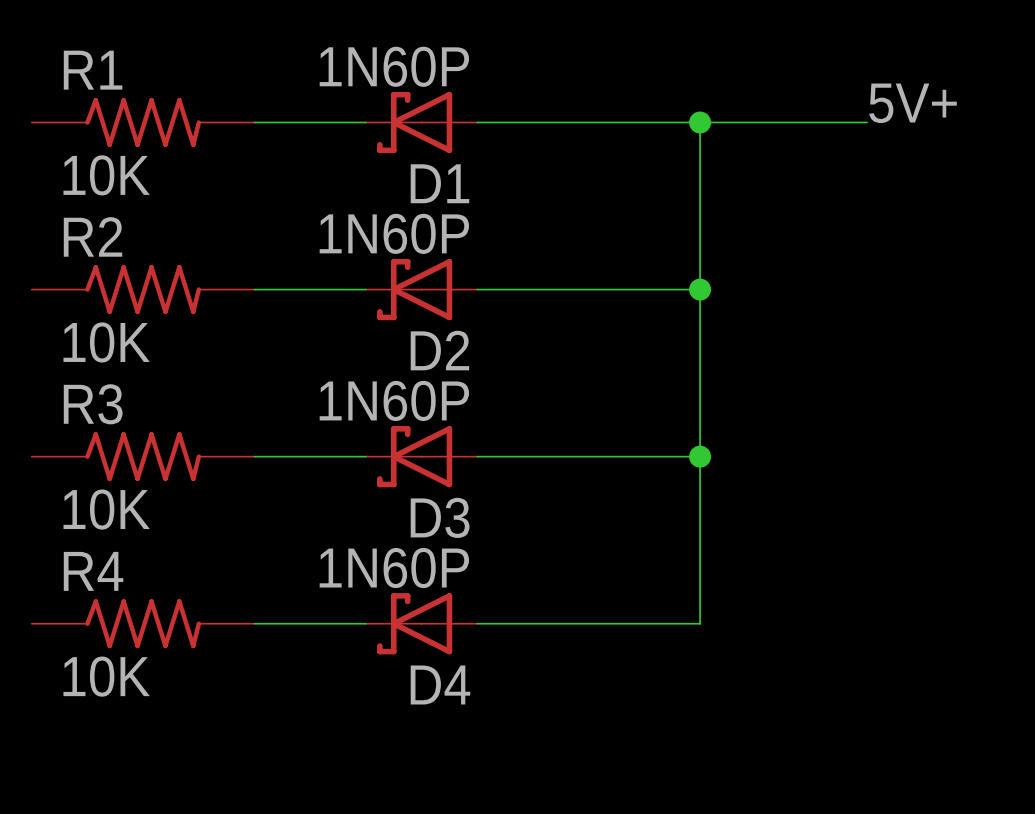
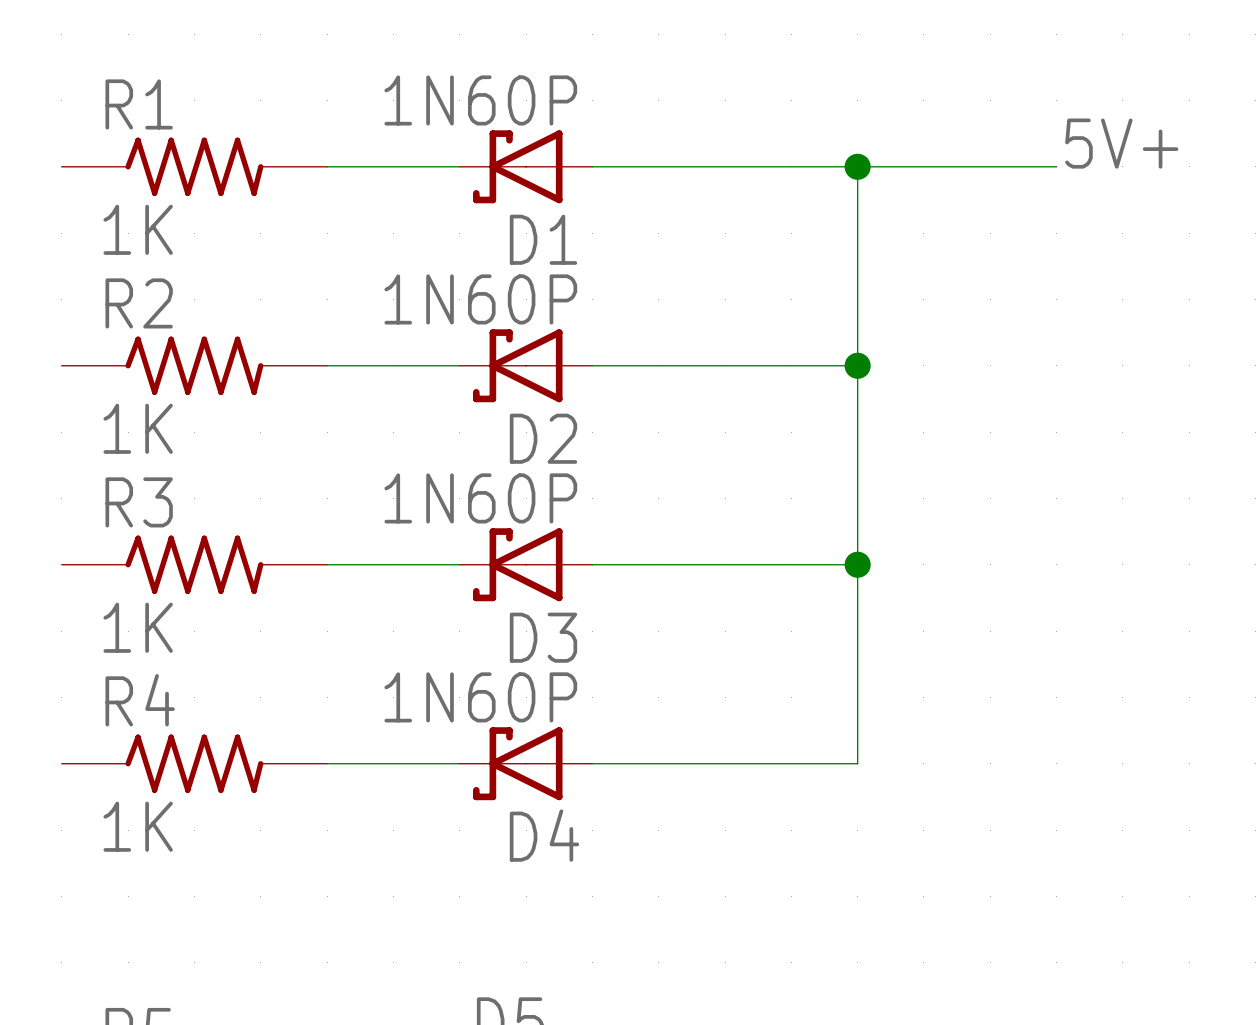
R1 value: 10K (106, 175) -> 1K (138, 229)
R2 value: 10K (106, 342) -> 1K (138, 428)
R3 value: 10K (106, 509) -> 1K (138, 627)
R4 value: 10K (106, 676) -> 1K (138, 826)

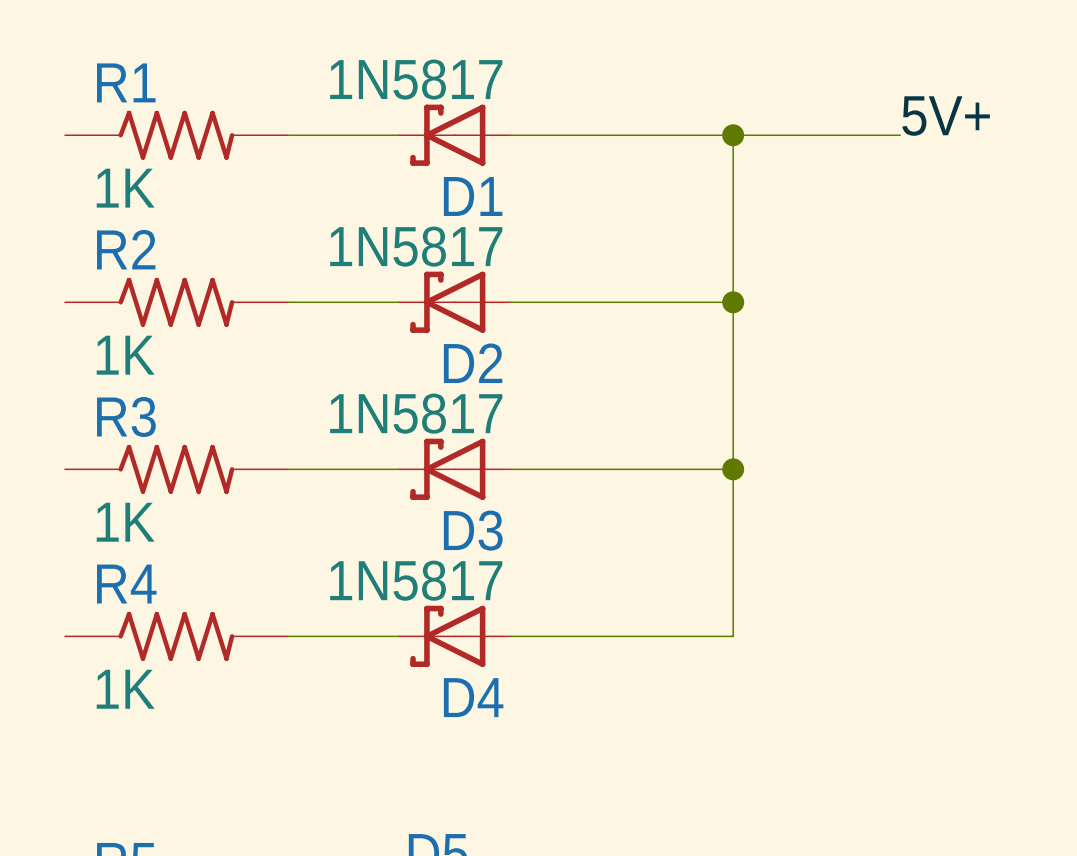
D1 value: 1N60P (480, 100) -> 1N5817 (416, 79)
D2 value: 1N60P (480, 299) -> 1N5817 (416, 246)
D3 value: 1N60P (480, 498) -> 1N5817 (416, 413)
D4 value: 1N60P (480, 697) -> 1N5817 (416, 580)

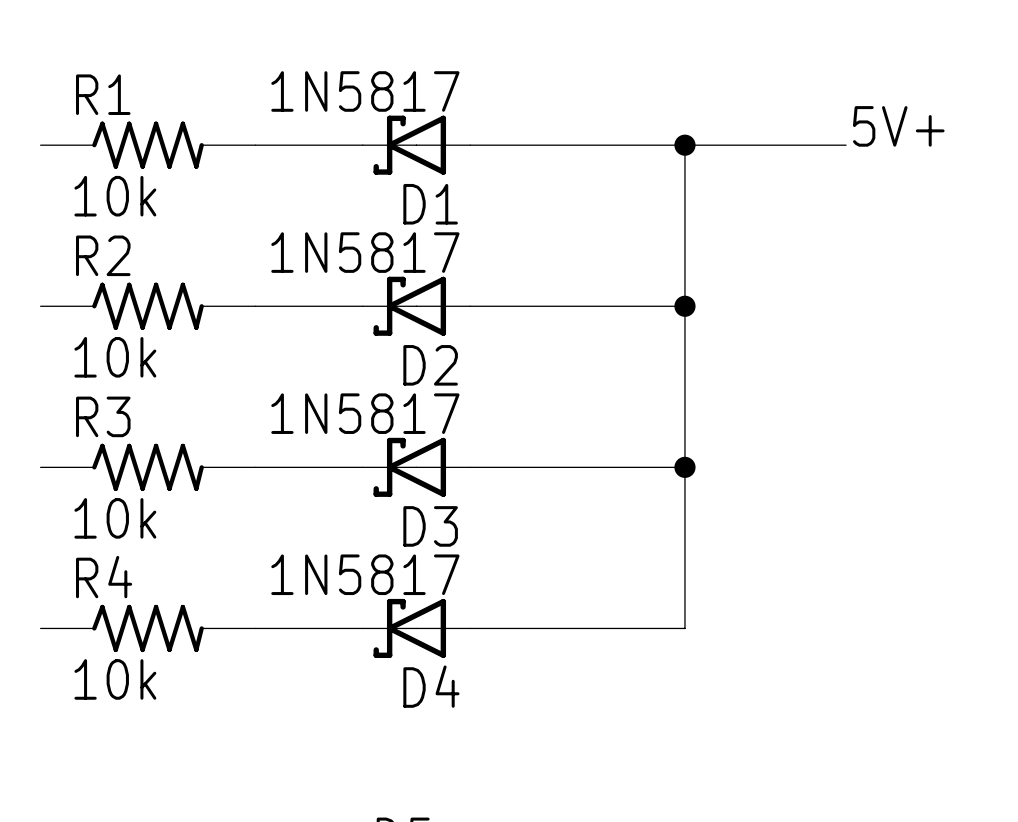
R1 value: 1K (125, 188) -> 10k (115, 196)
R2 value: 1K (125, 355) -> 10k (115, 357)
R3 value: 1K (125, 522) -> 10k (115, 518)
R4 value: 1K (125, 689) -> 10k (115, 679)

